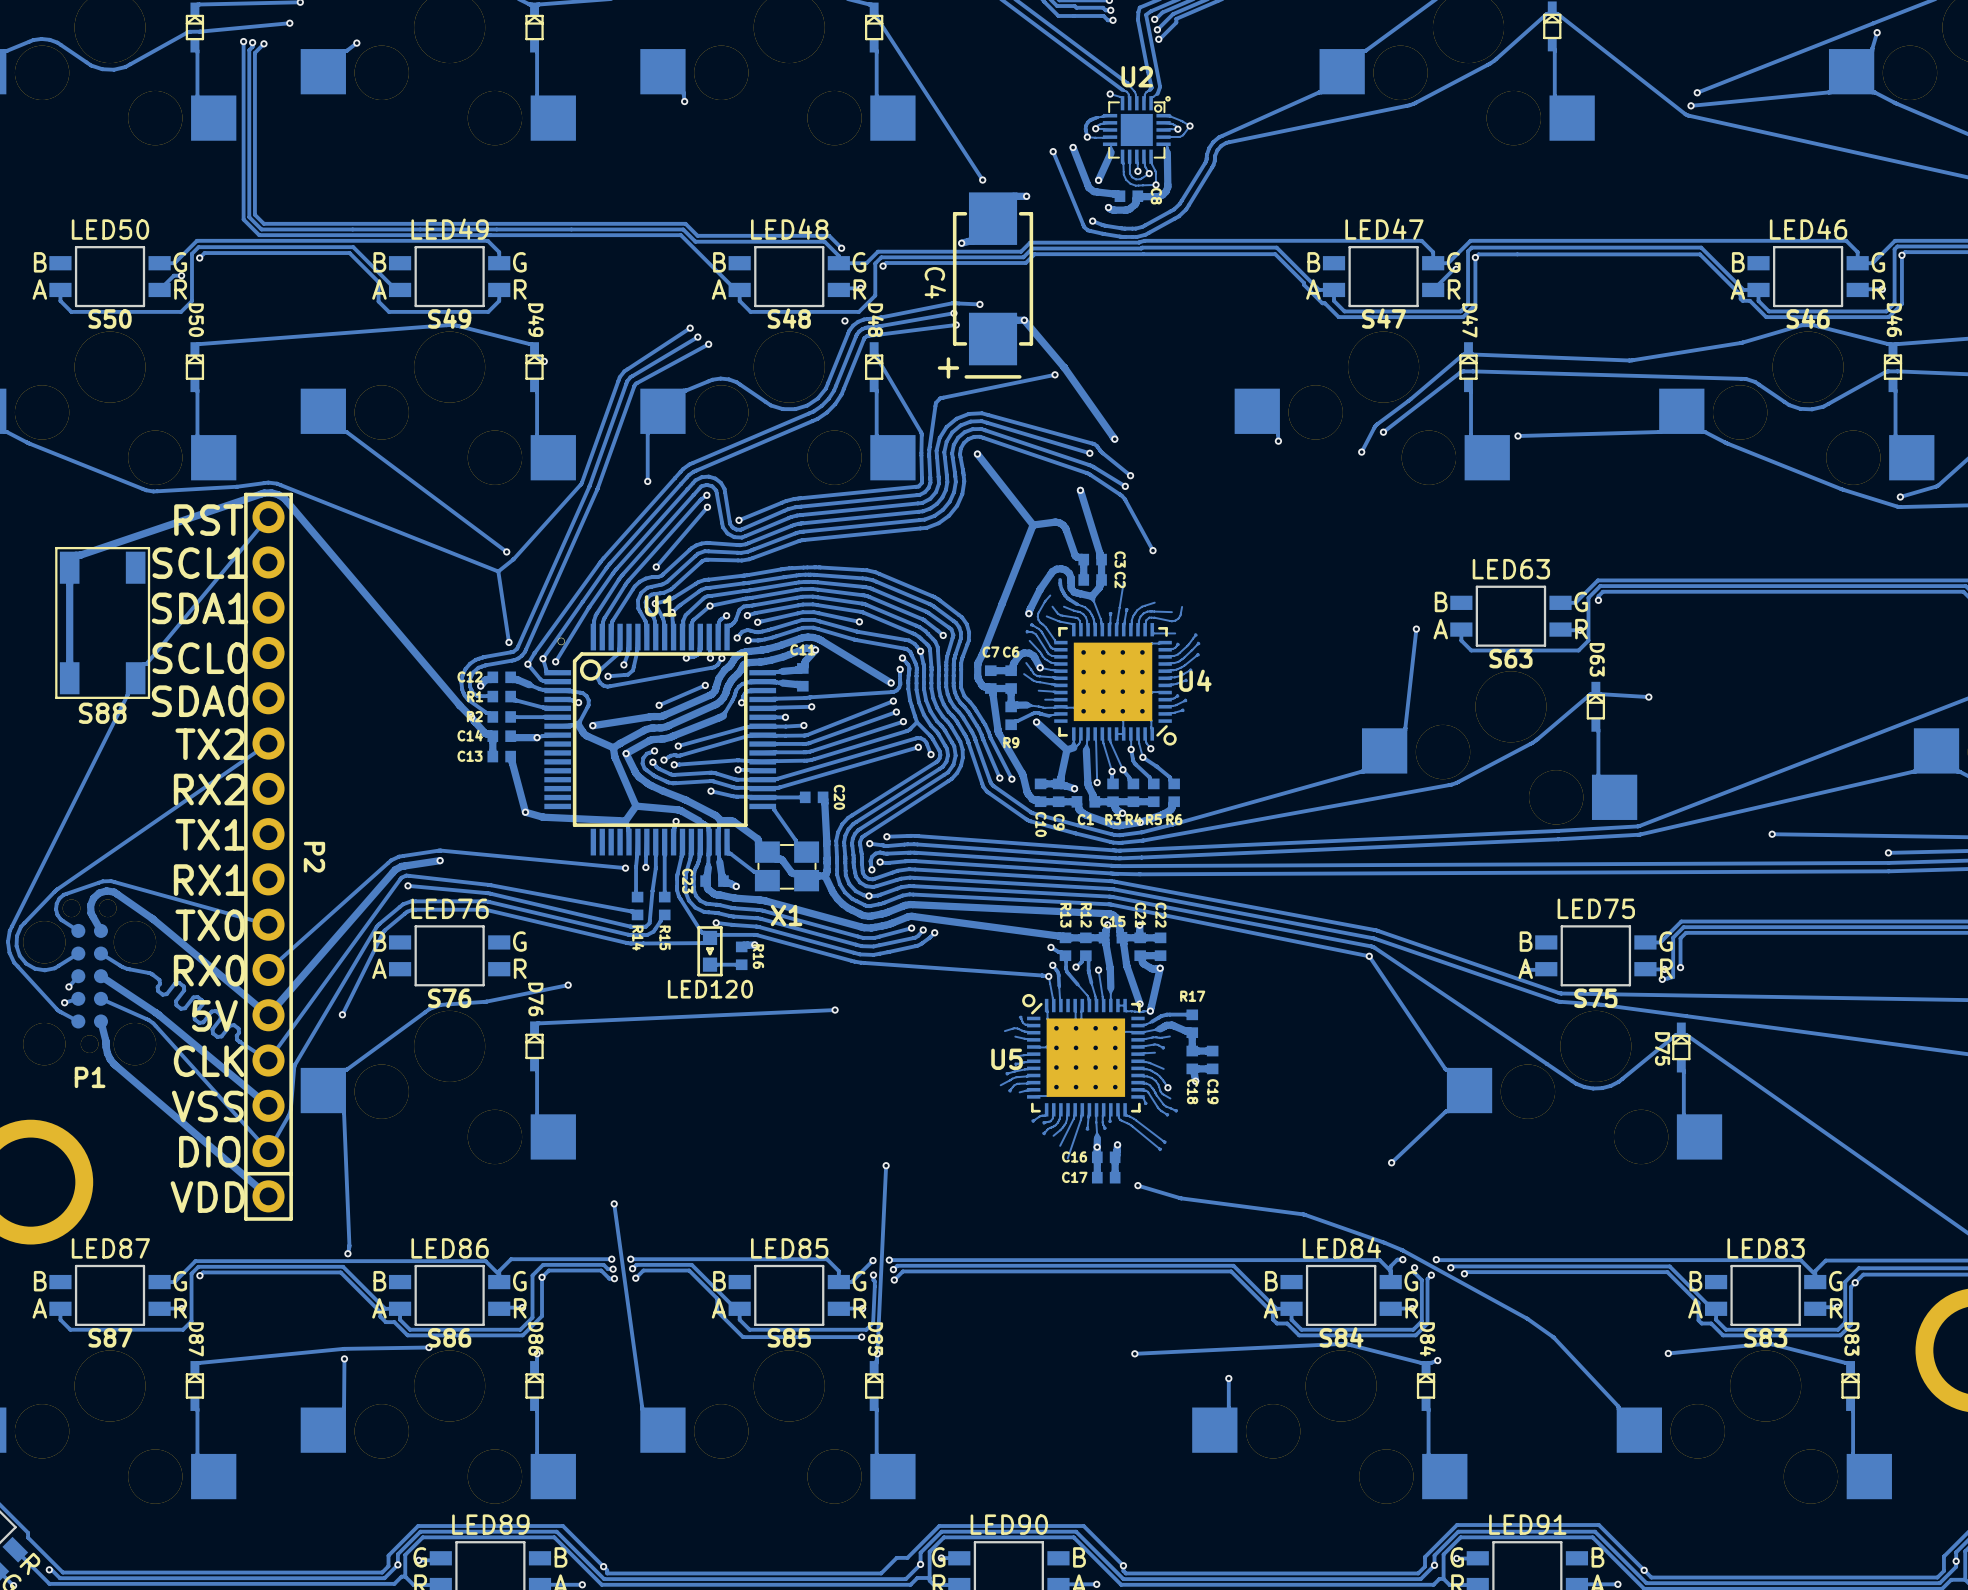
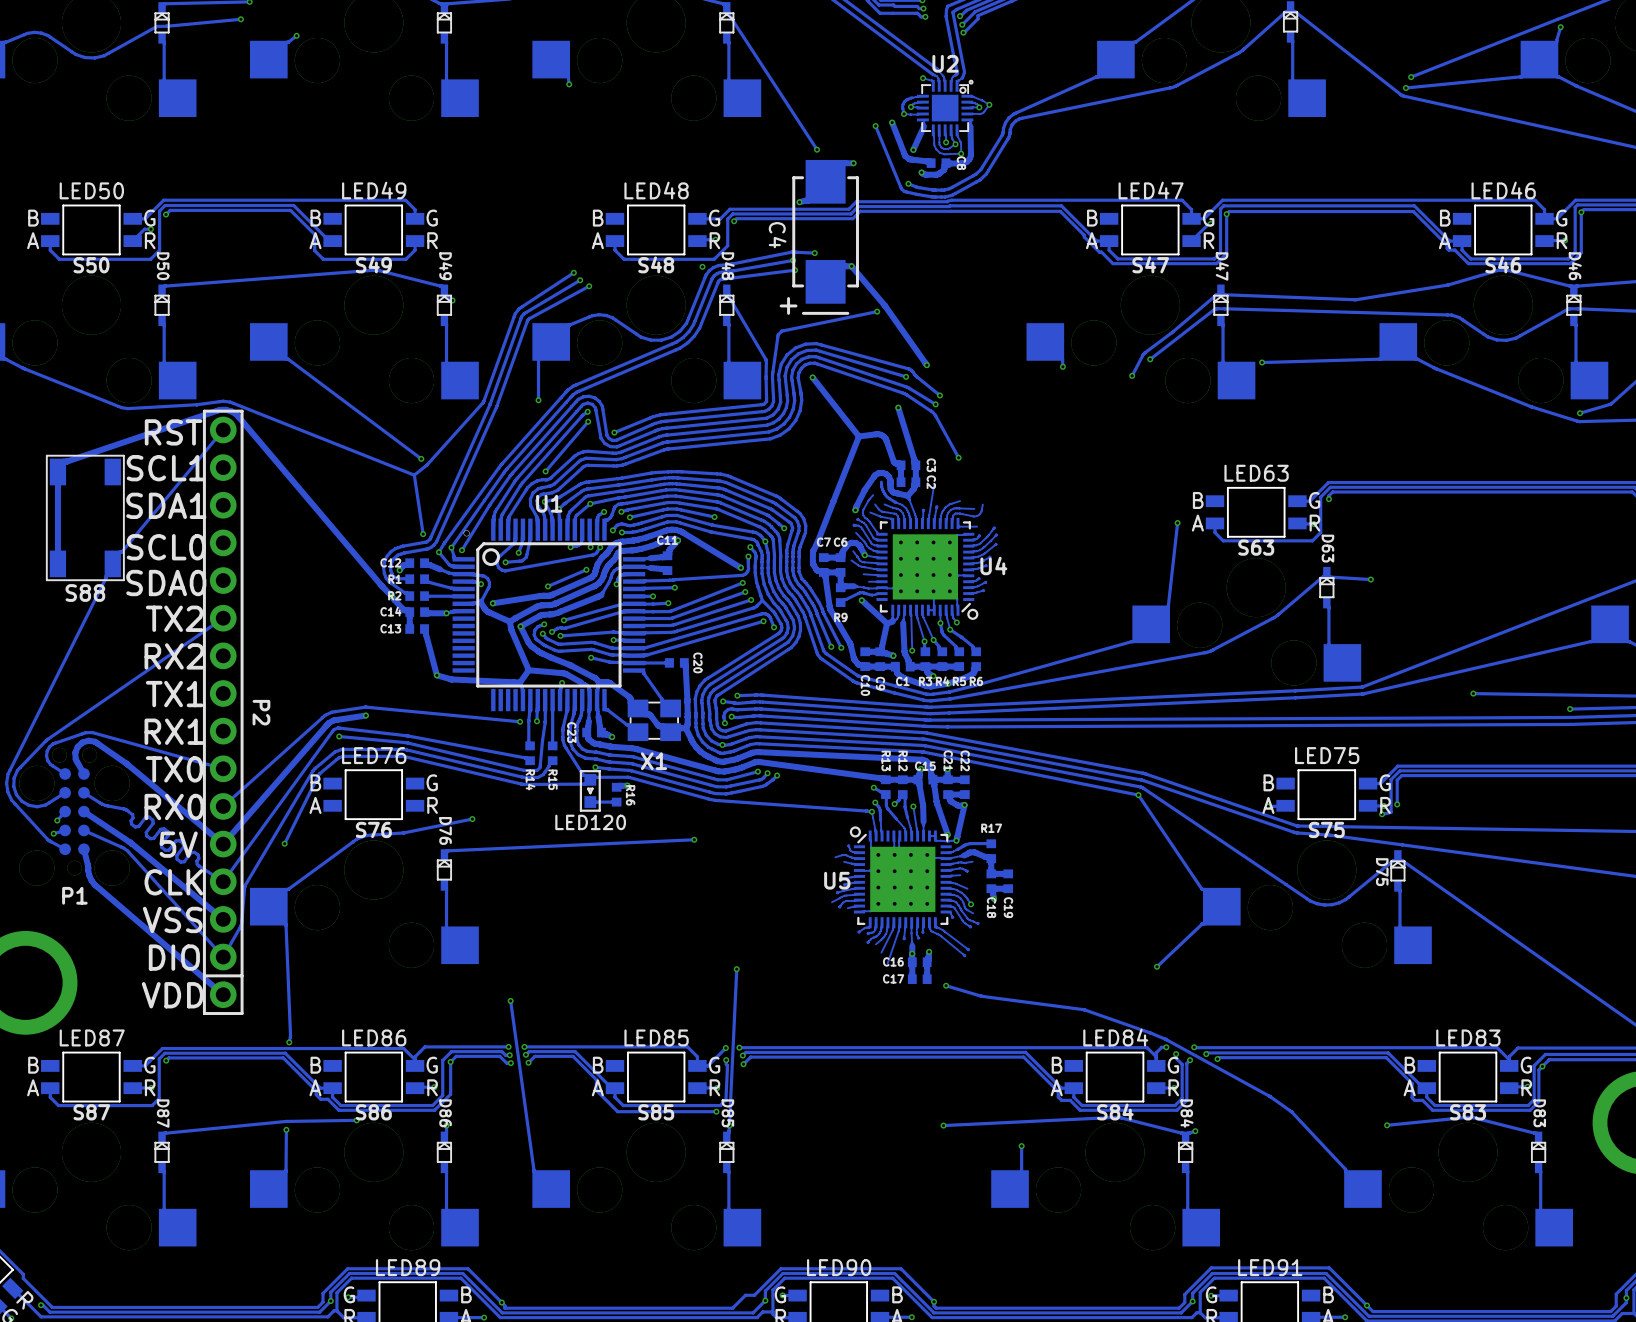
track: (243, 41) (243, 219) (259, 235) (680, 235) (735, 289) (739, 289) -> none
via: (243, 41) -> none
track: (252, 42) (252, 46) (249, 50) (249, 217) (261, 229) (683, 229) (695, 241) (824, 241) (838, 255) (838, 263) -> none
via: (252, 42) -> none
track: (263, 43) (254, 52) (254, 214) (263, 223) (685, 223) (697, 235) (829, 235) (841, 248) -> none
via: (263, 43) -> none
via: (841, 248) -> none

